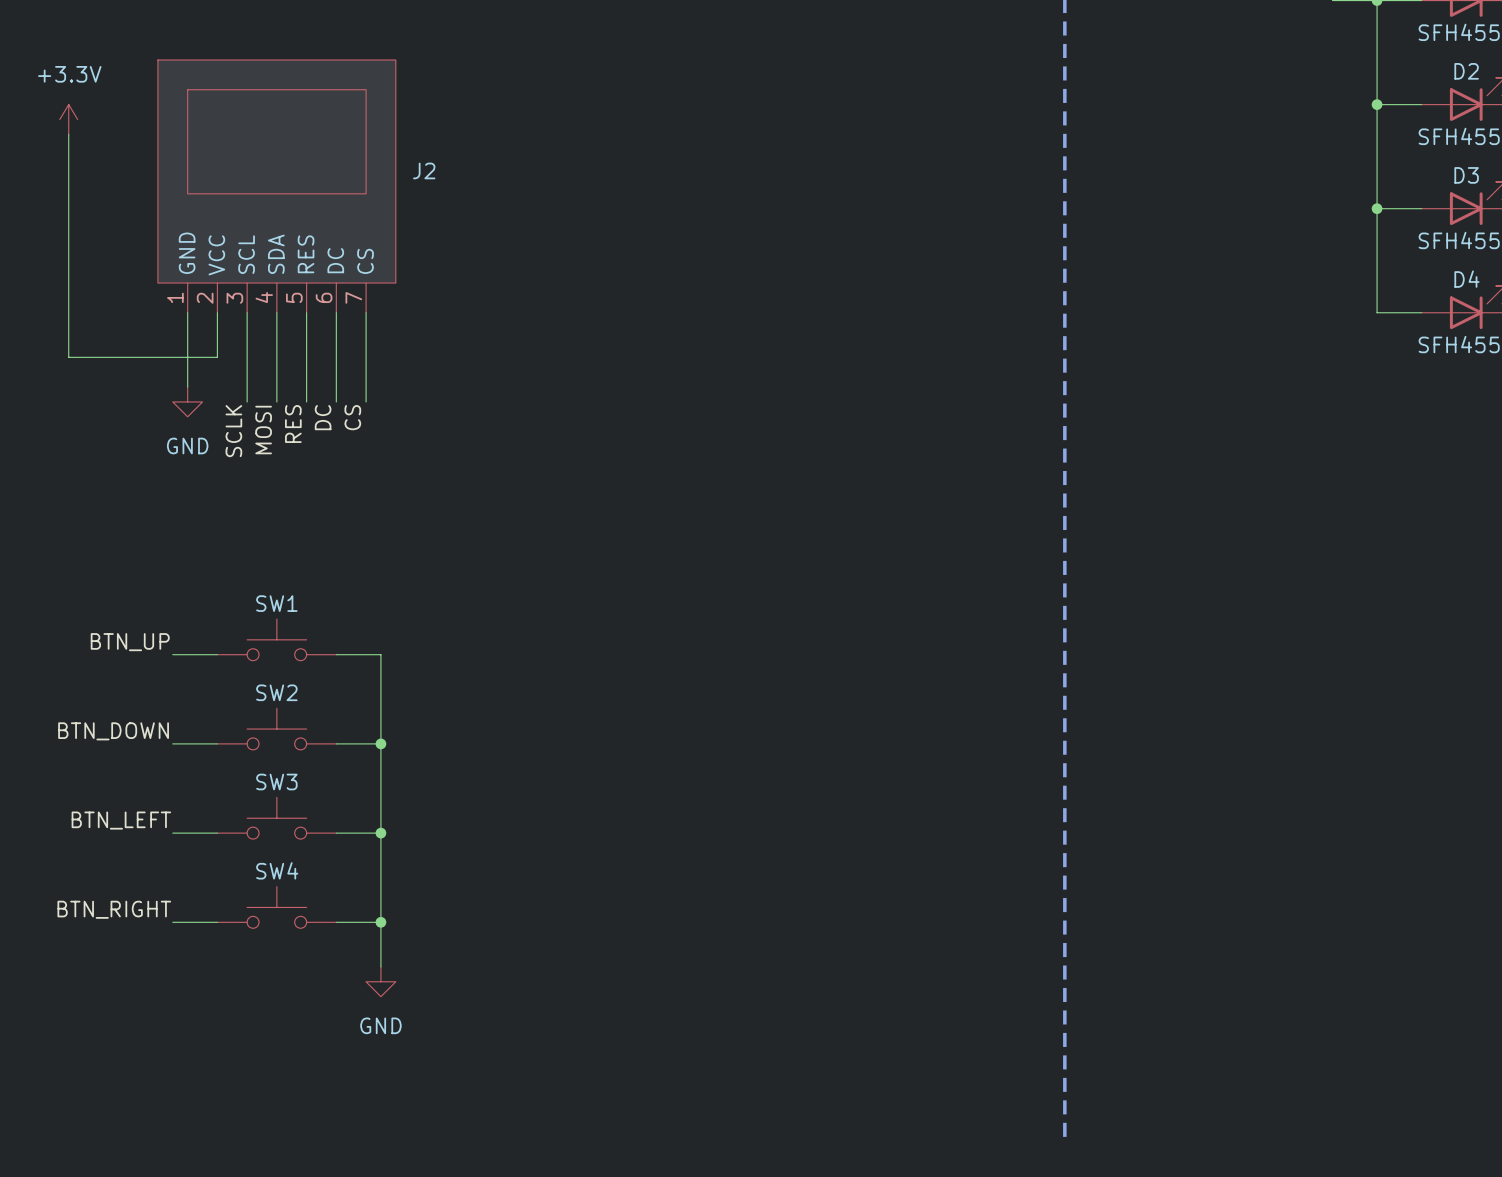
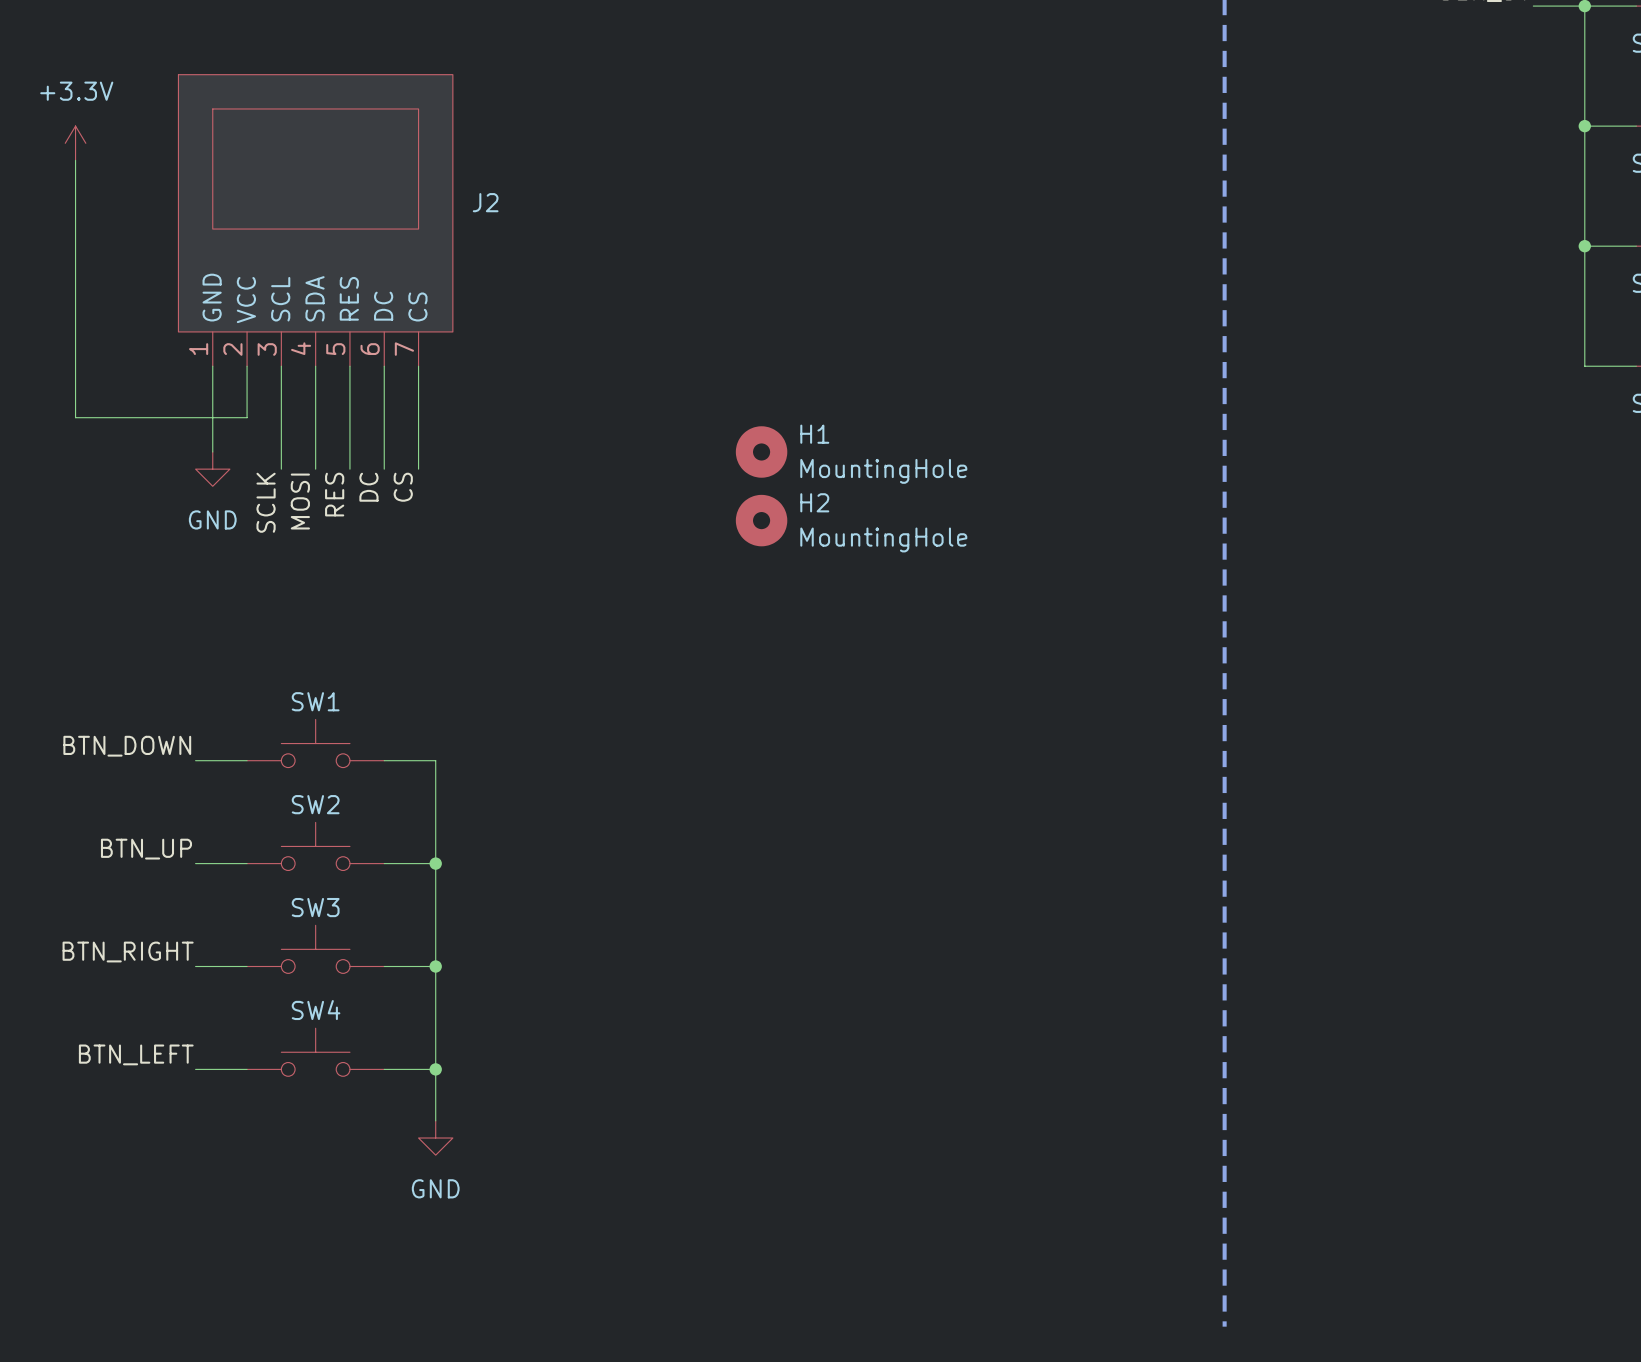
H1: none -> MountingHole (761, 451)
H2: none -> MountingHole (761, 520)
label: BTN_UP (130, 642) -> BTN_DOWN (127, 746)
label: BTN_DOWN (113, 731) -> BTN_UP (146, 849)
label: BTN_LEFT (121, 820) -> BTN_RIGHT (128, 952)
label: BTN_RIGHT (114, 909) -> BTN_LEFT (136, 1054)

